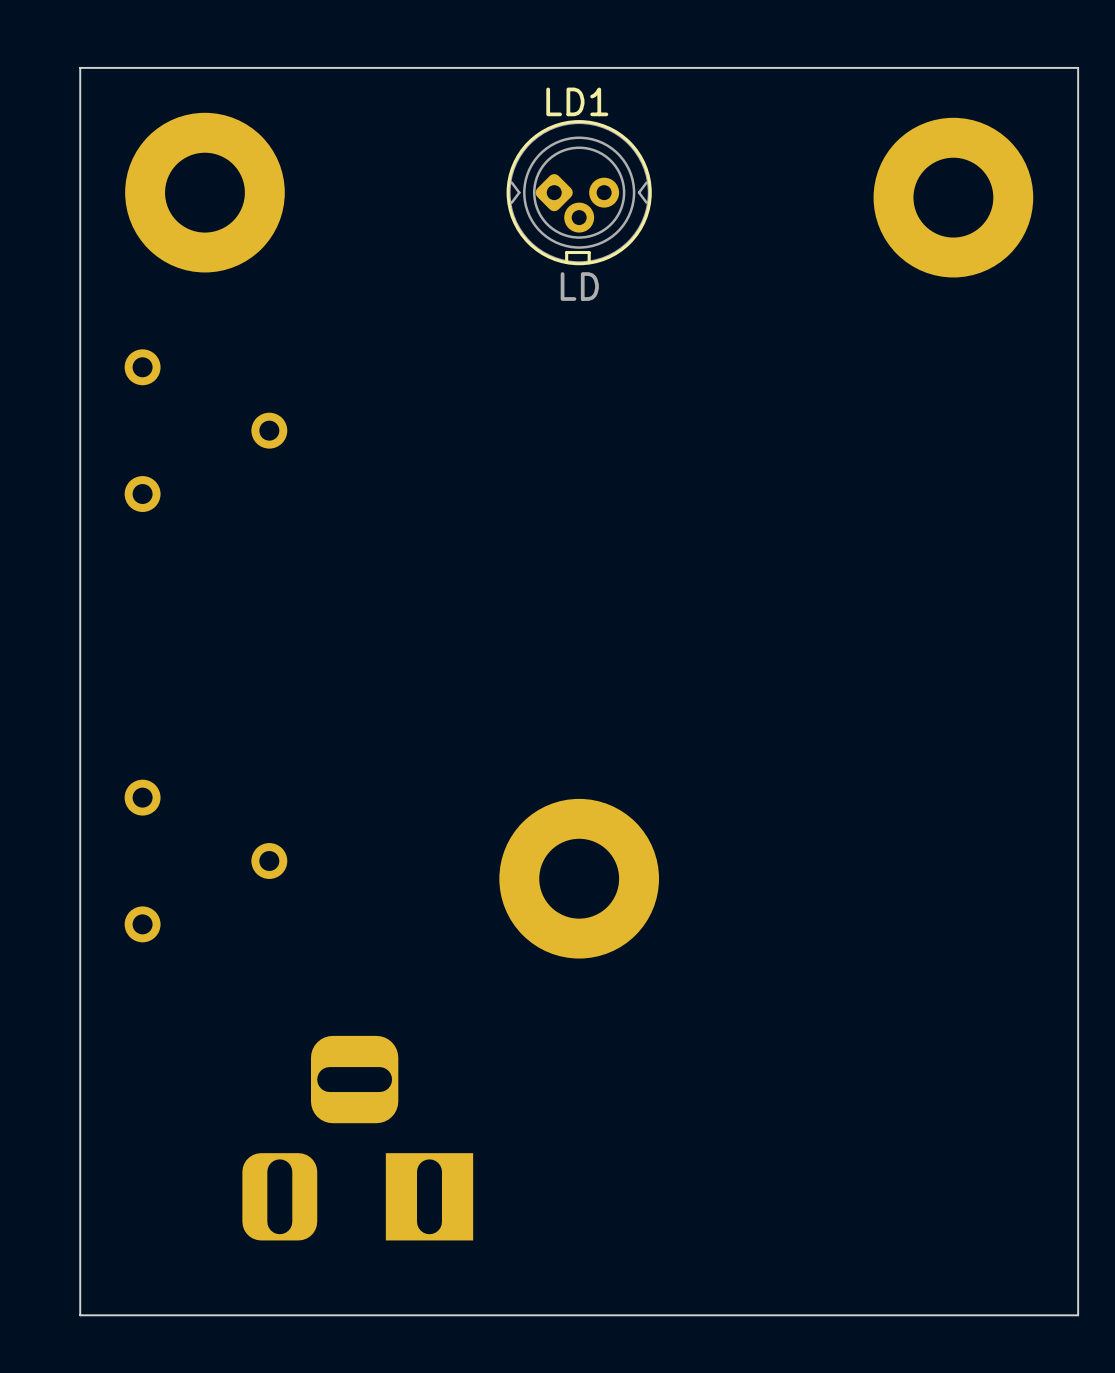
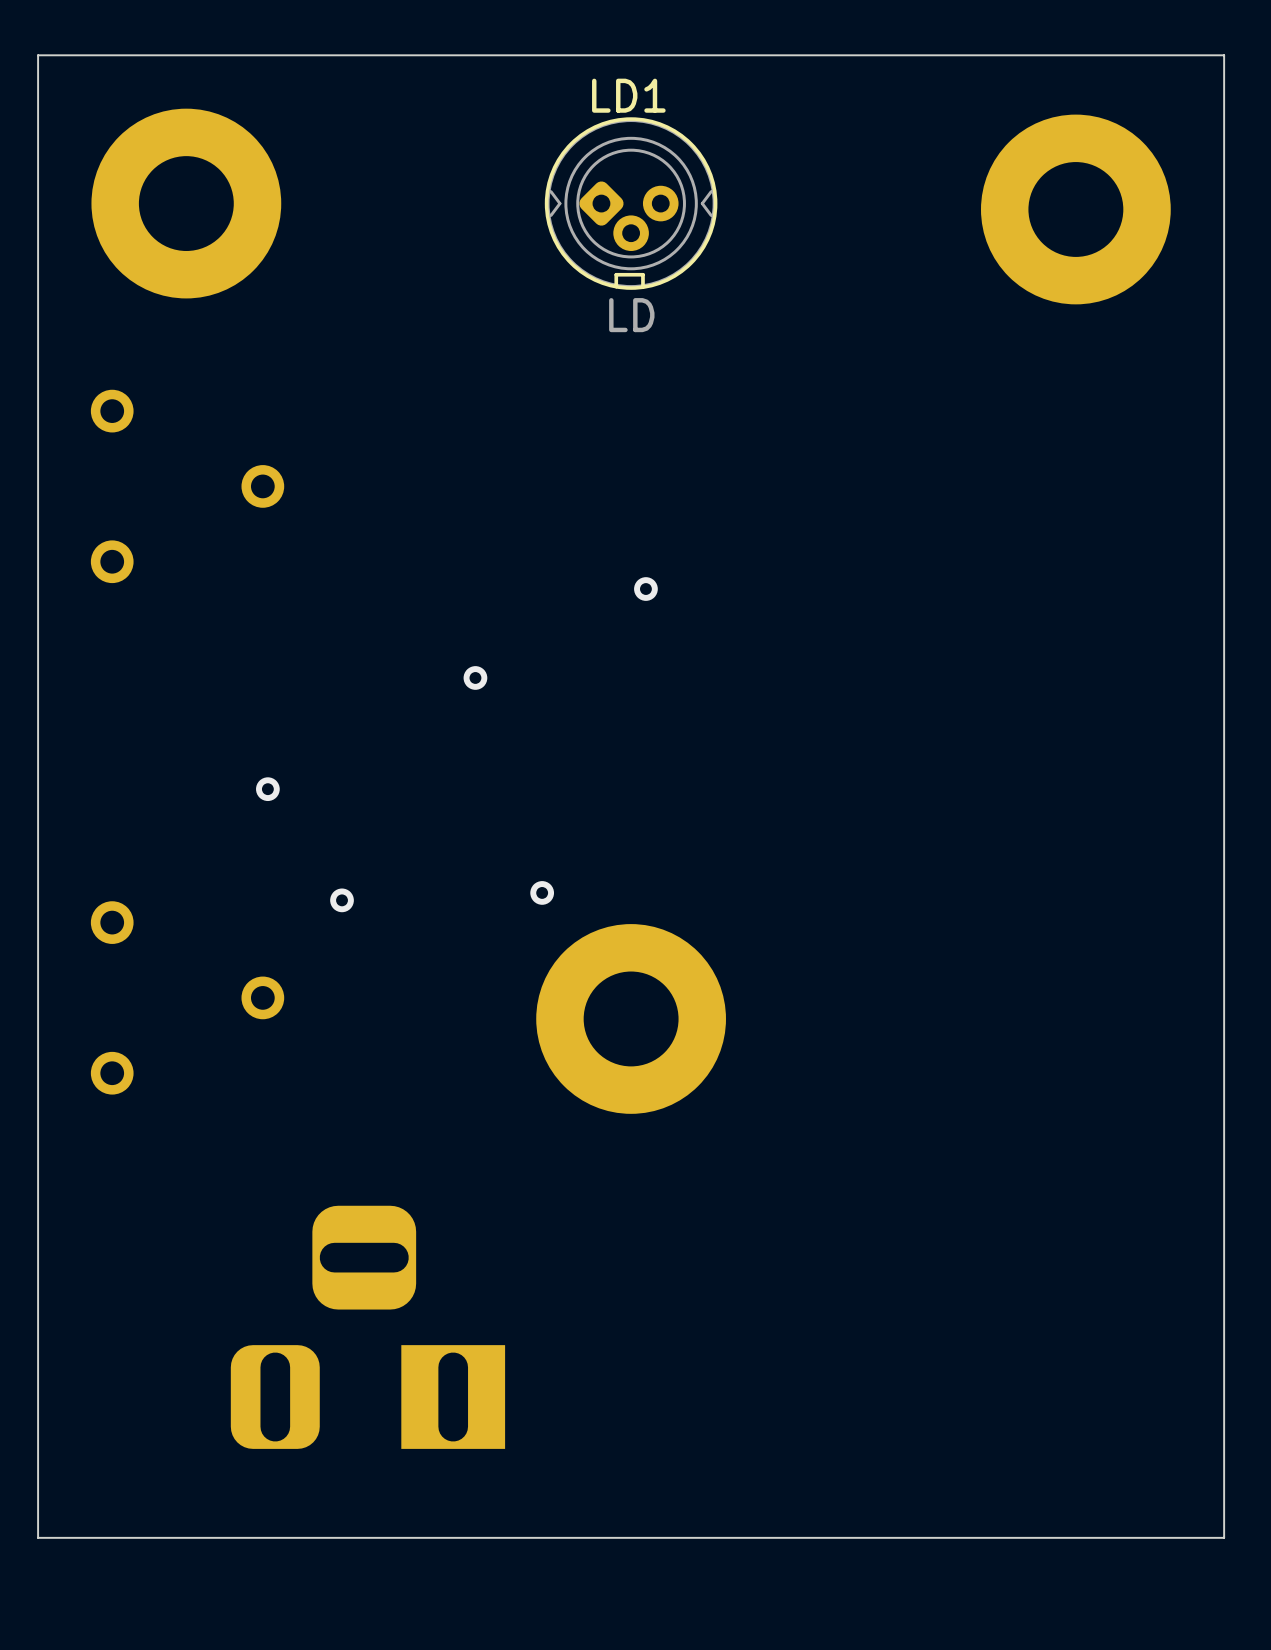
via: none -> (645, 589)
via: none -> (475, 677)
via: none -> (267, 789)
via: none -> (542, 892)
via: none -> (342, 900)

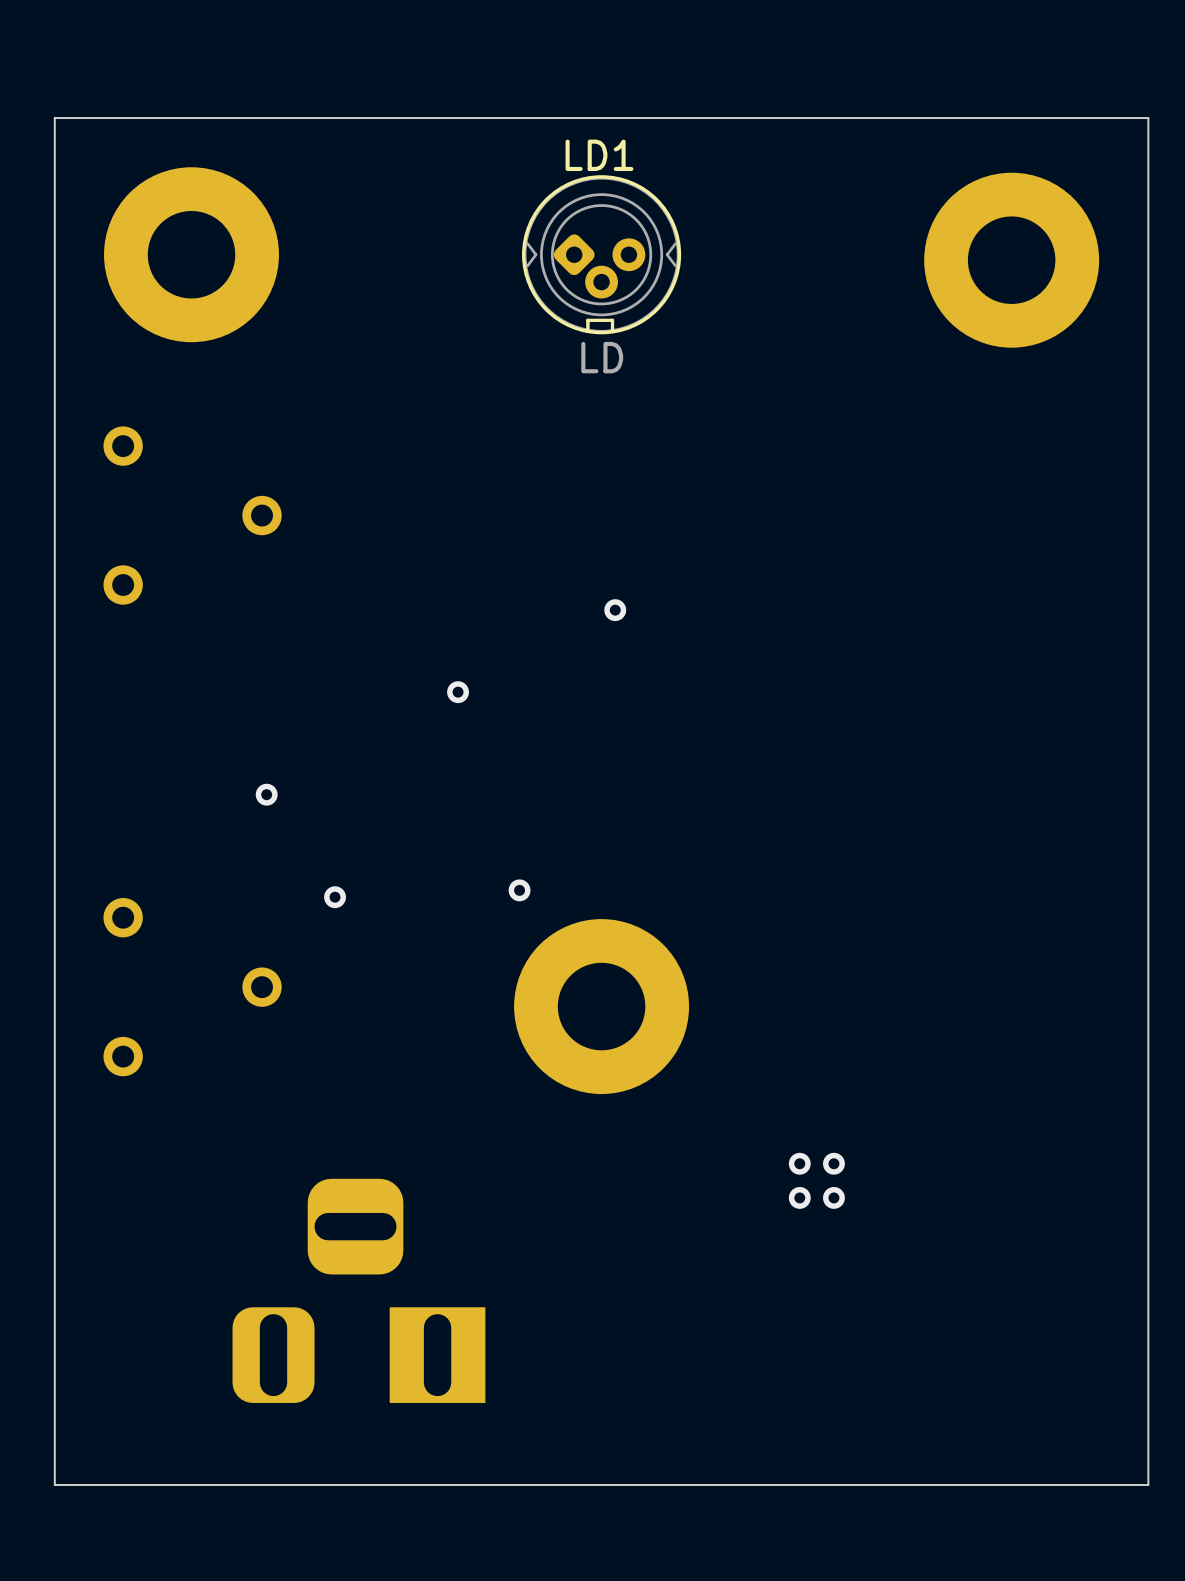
via: none -> (799, 1163)
via: none -> (833, 1163)
via: none -> (799, 1197)
via: none -> (833, 1197)

